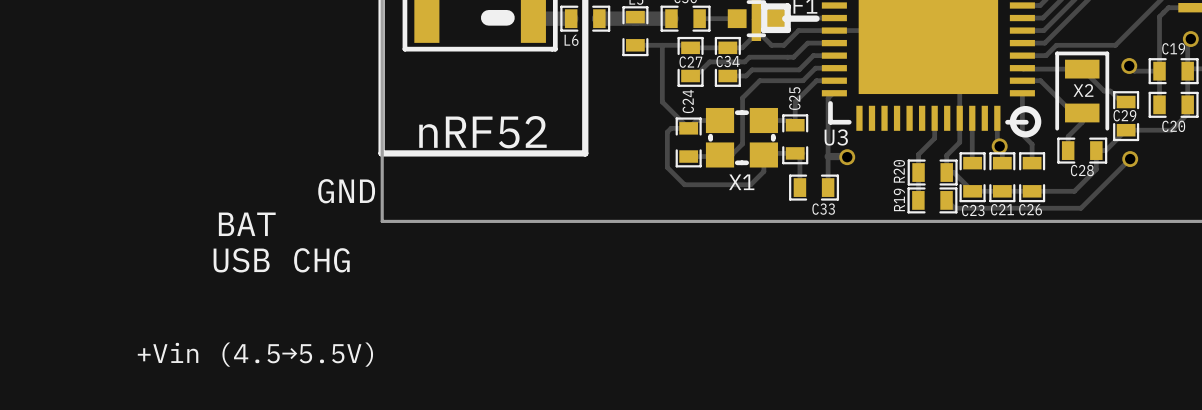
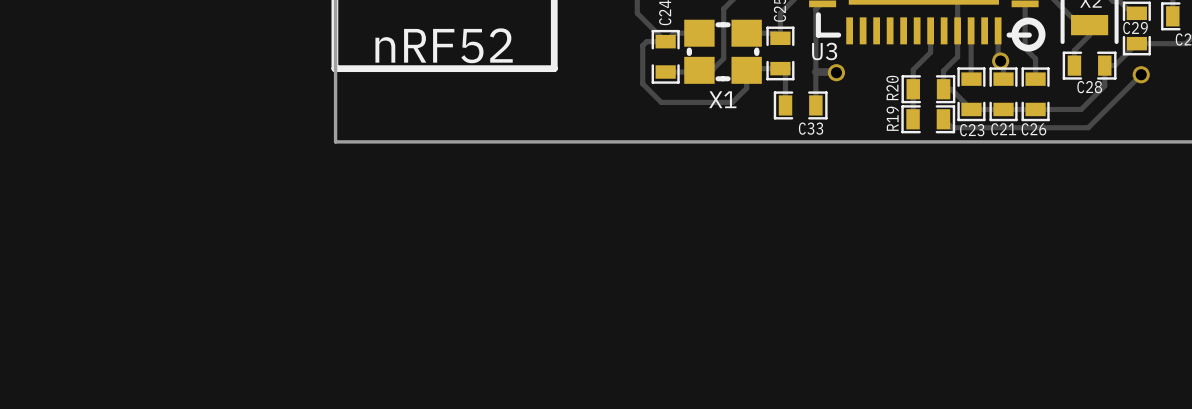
text: GND (346, 191) -> none
text: BAT (247, 224) -> none
text: USB CHG (281, 260) -> none
text: +Vin (4.5→5.5V) (255, 354) -> none

